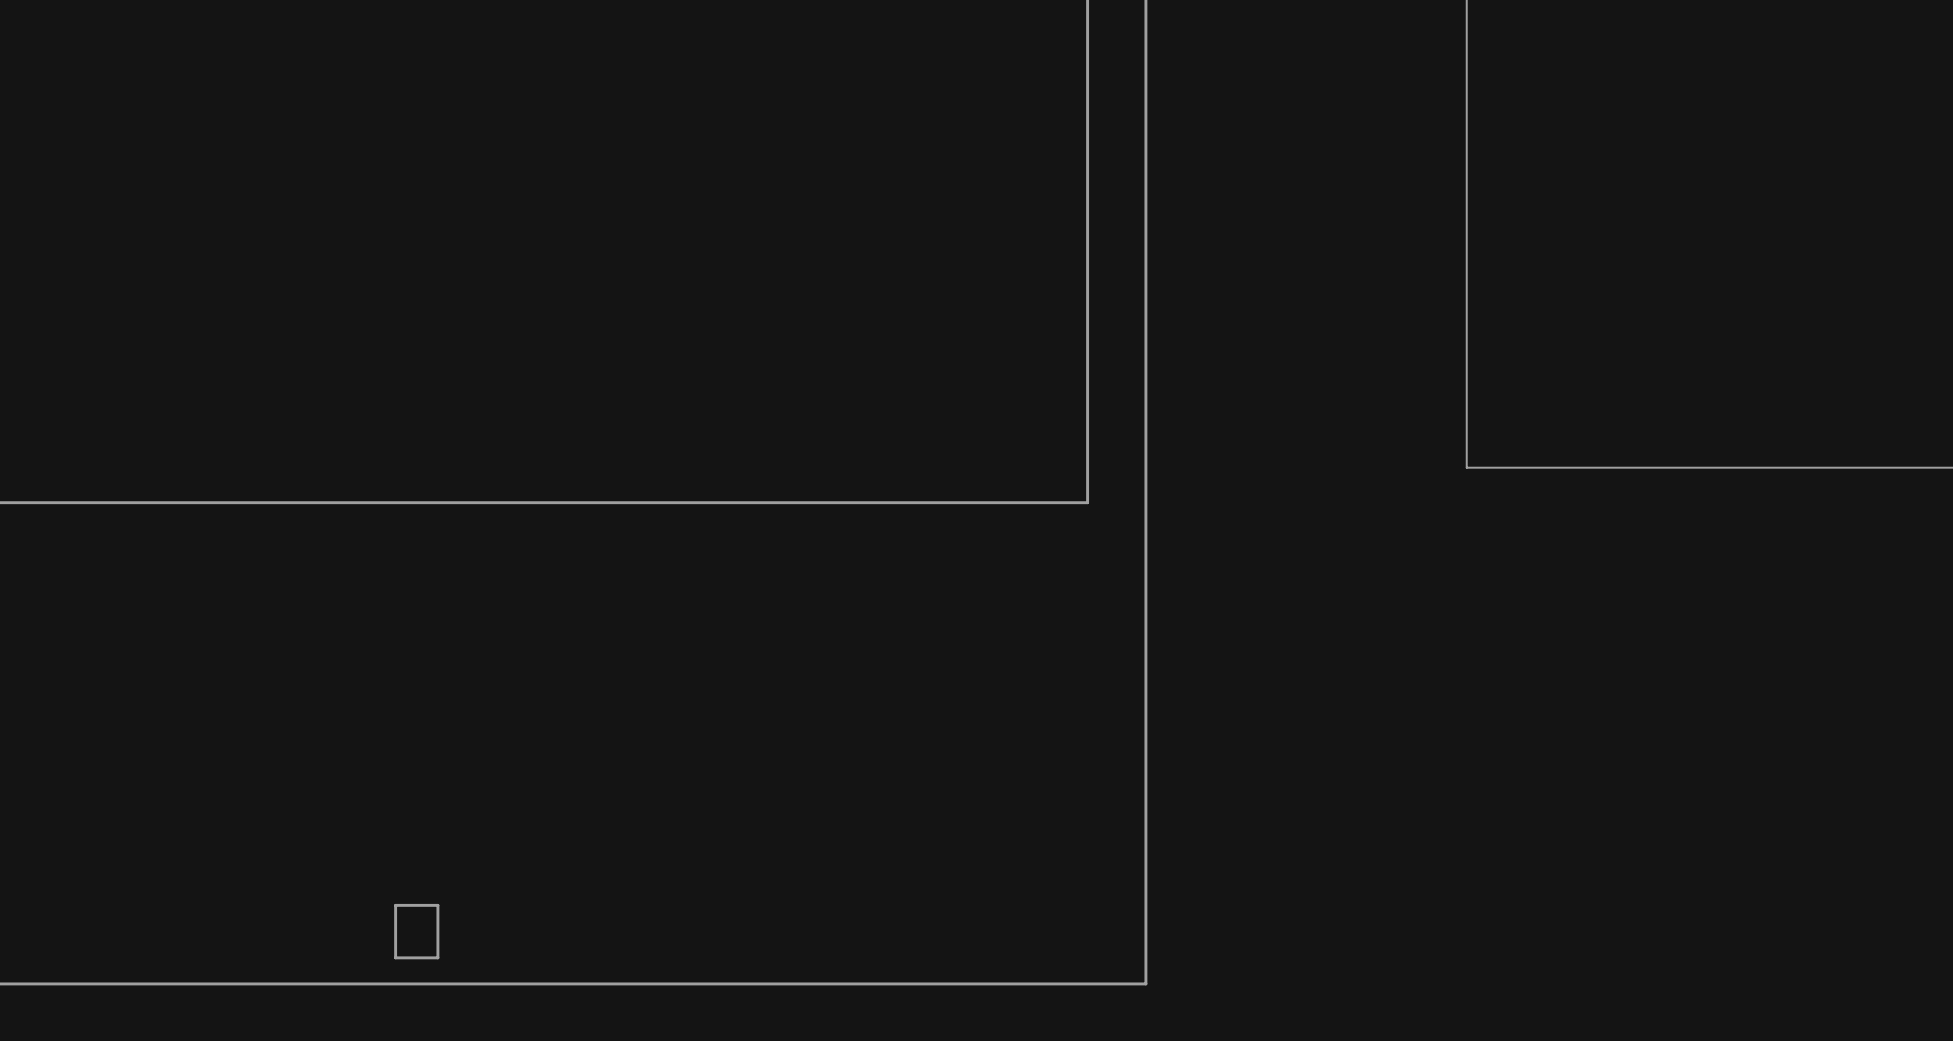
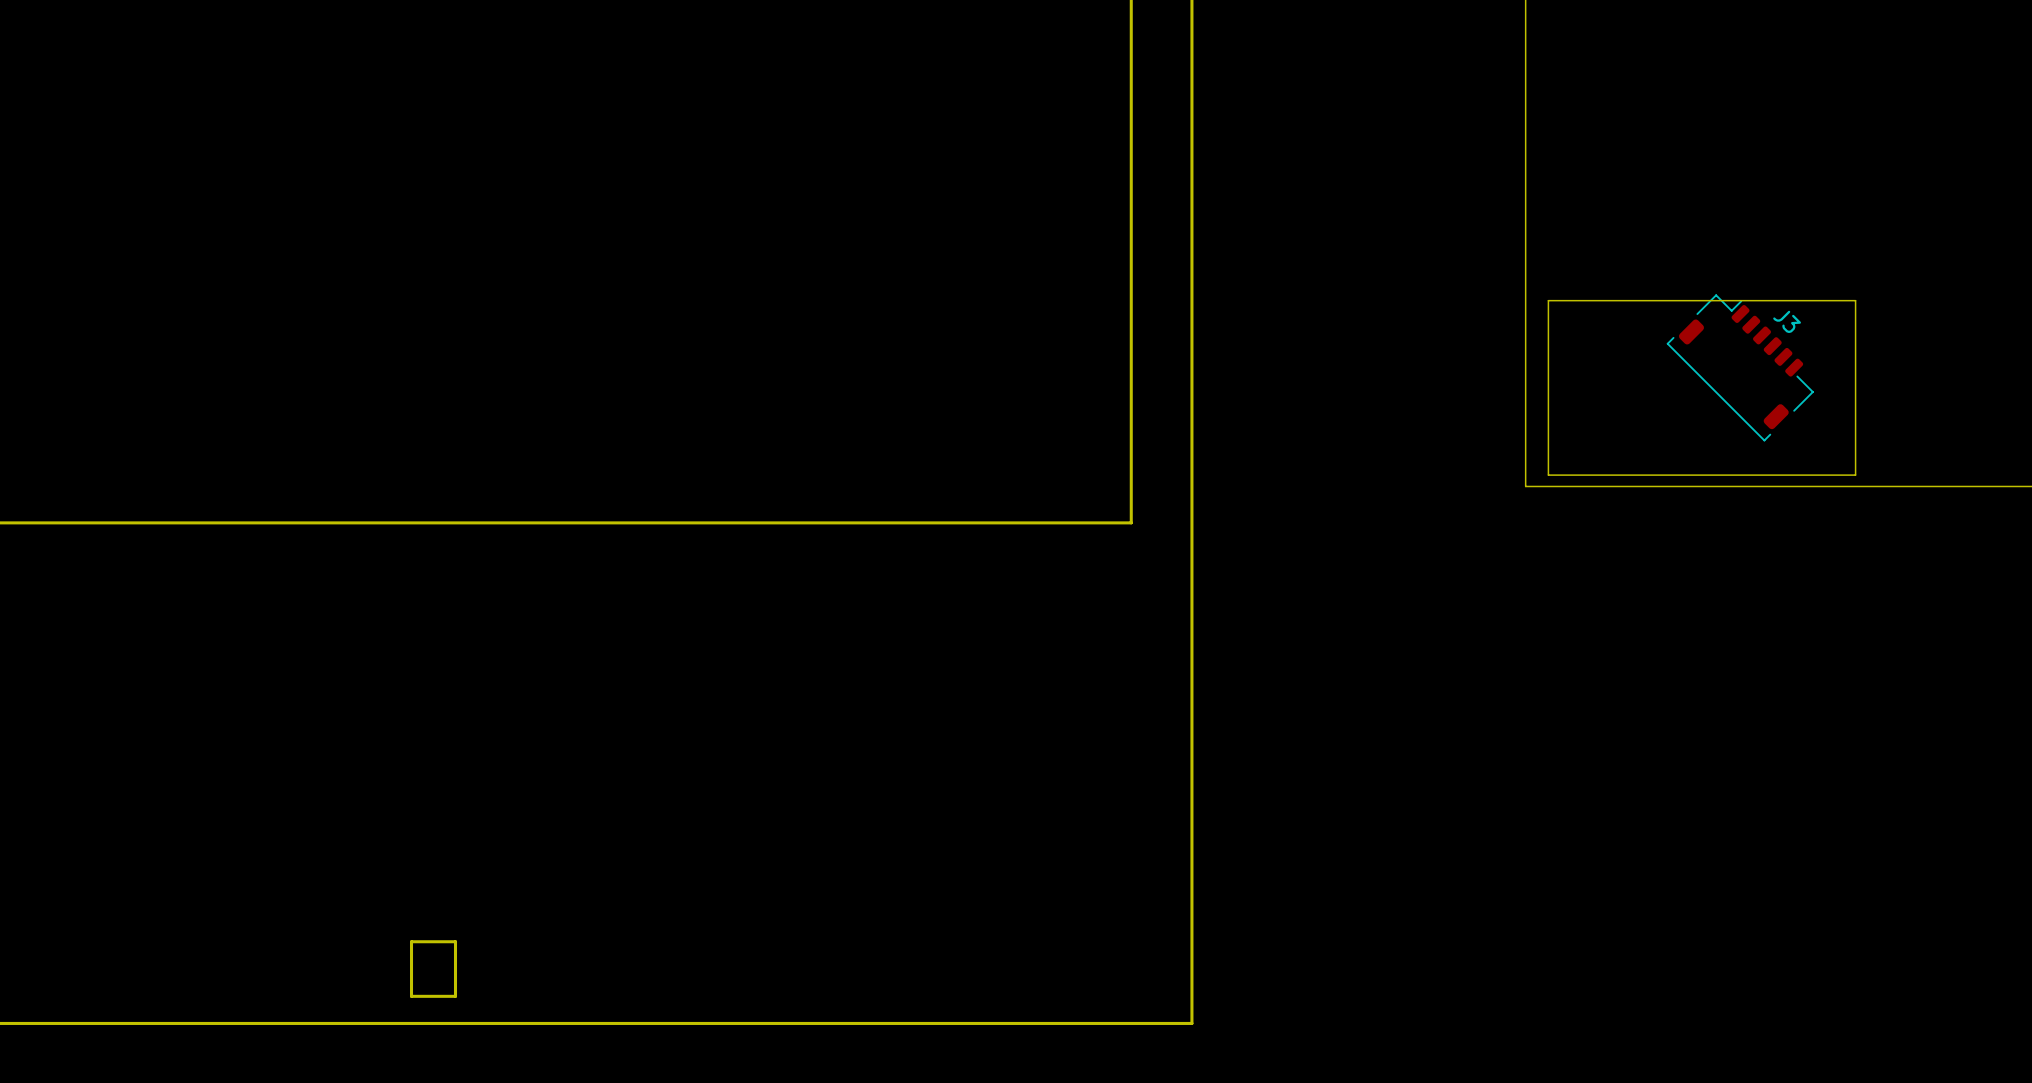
board edge: none -> (1548, 300) (1855, 300) (1855, 475) (1548, 475) (1548, 300)
J3: none -> (1740, 367)

